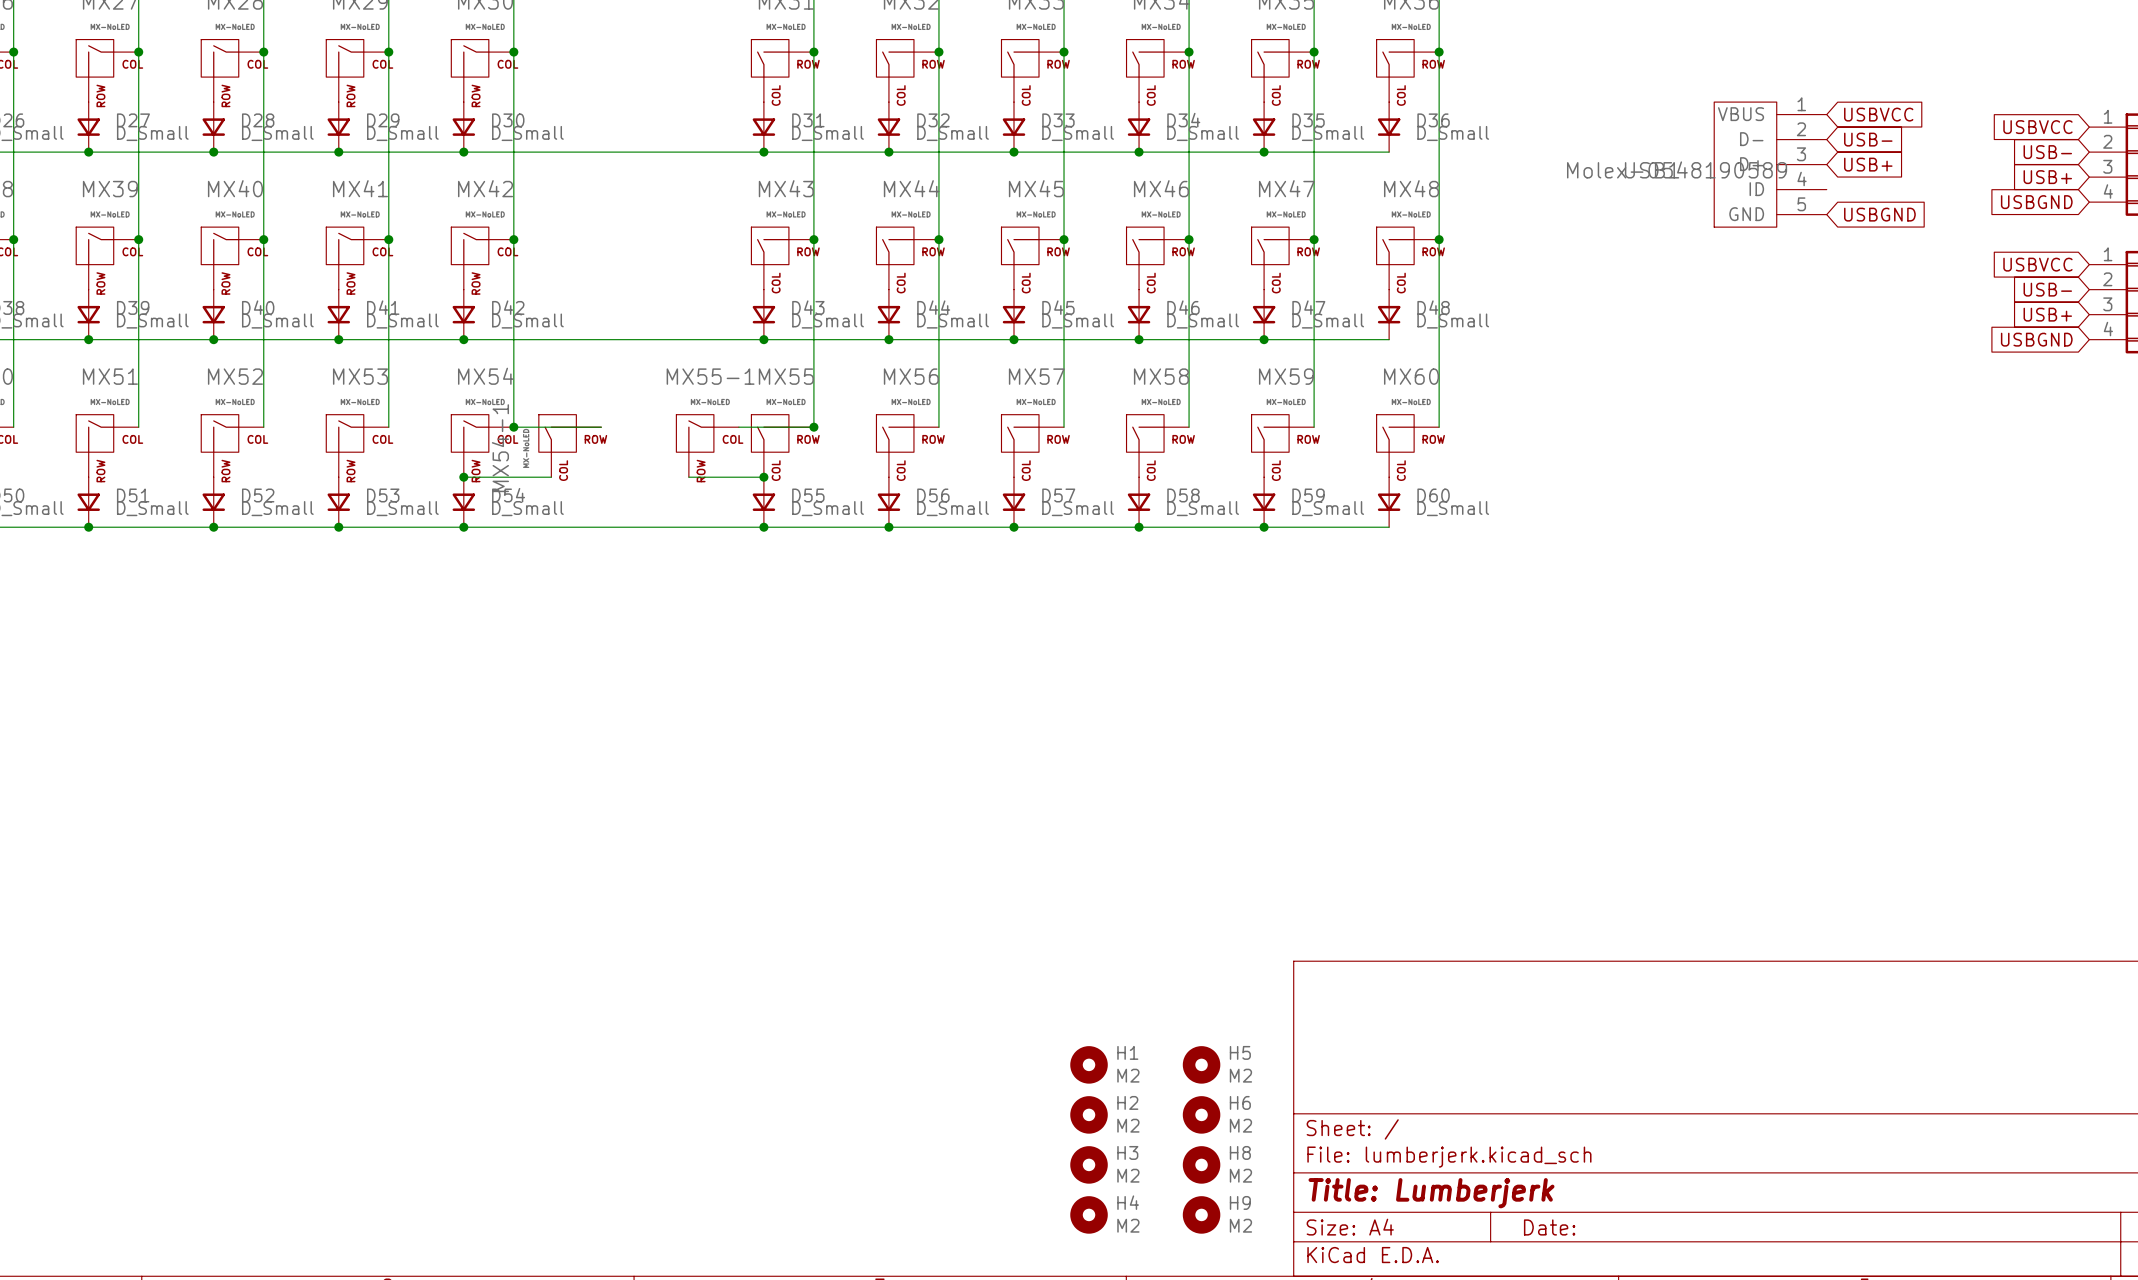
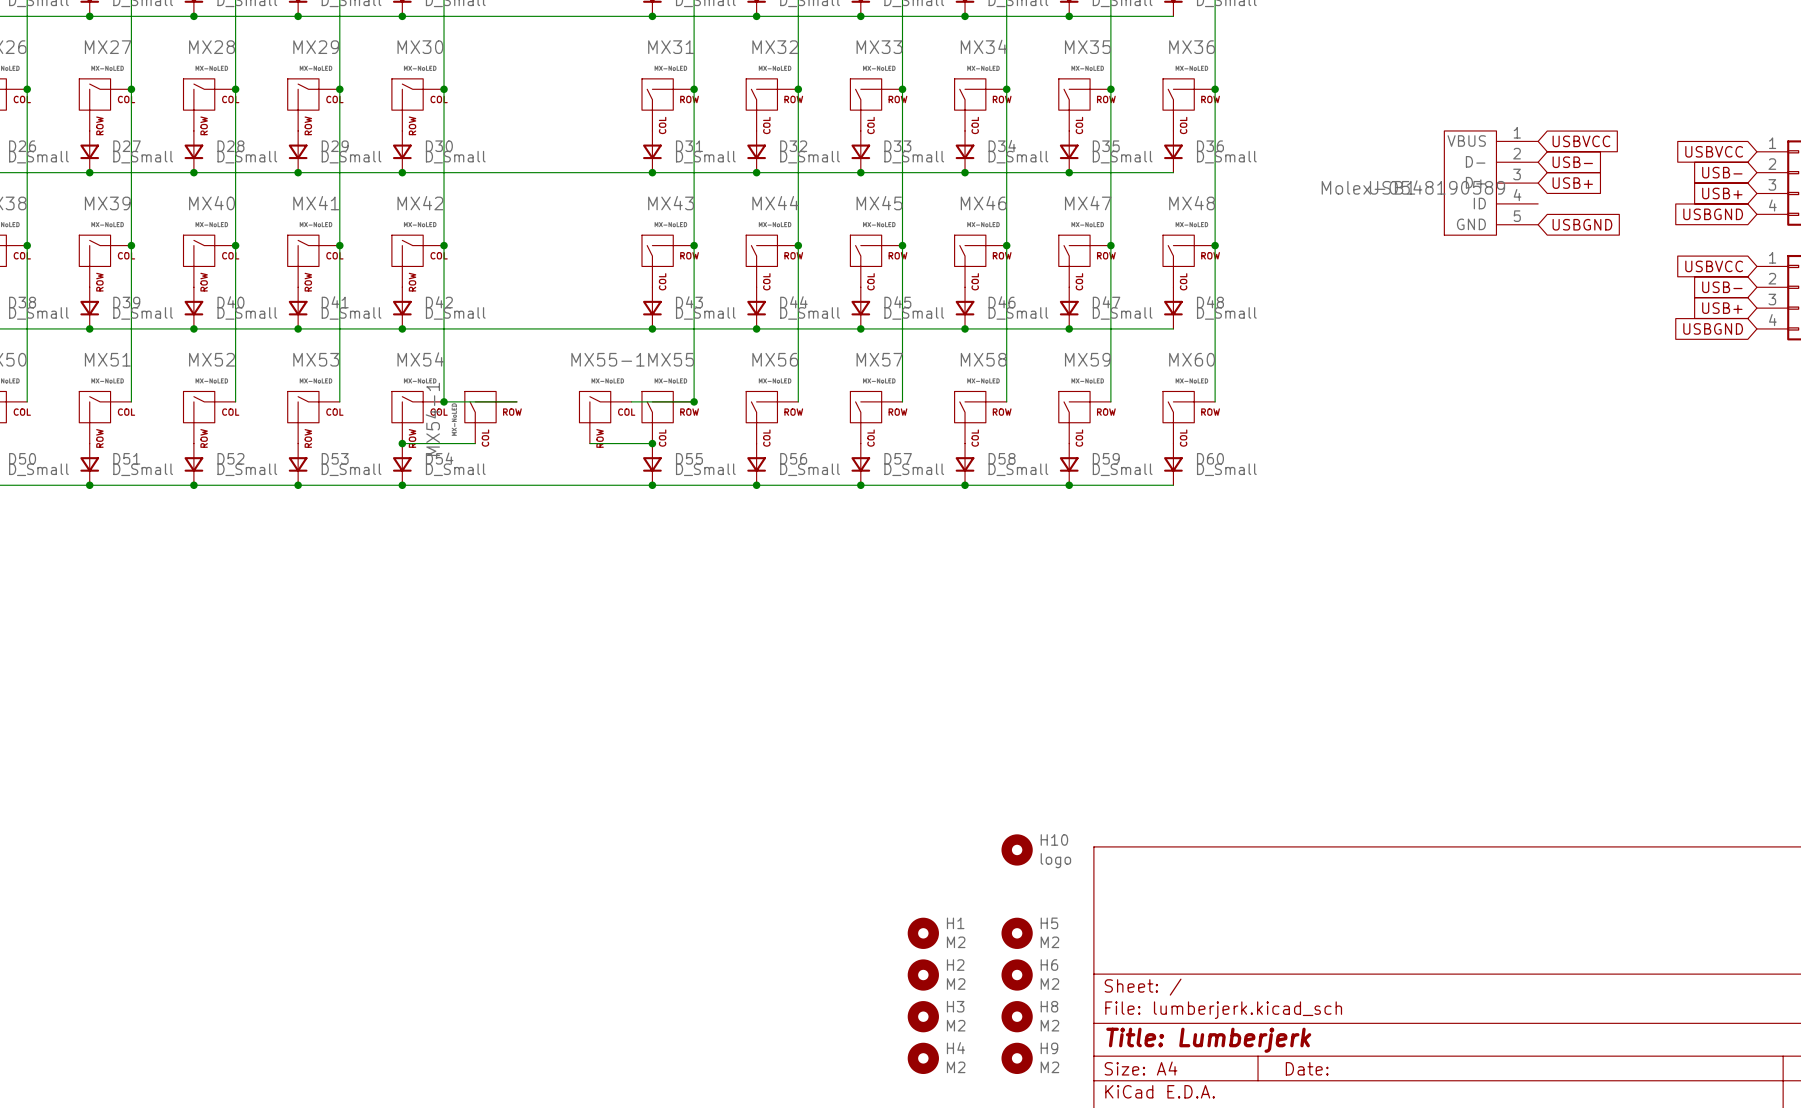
H10: none -> logo (1017, 849)

